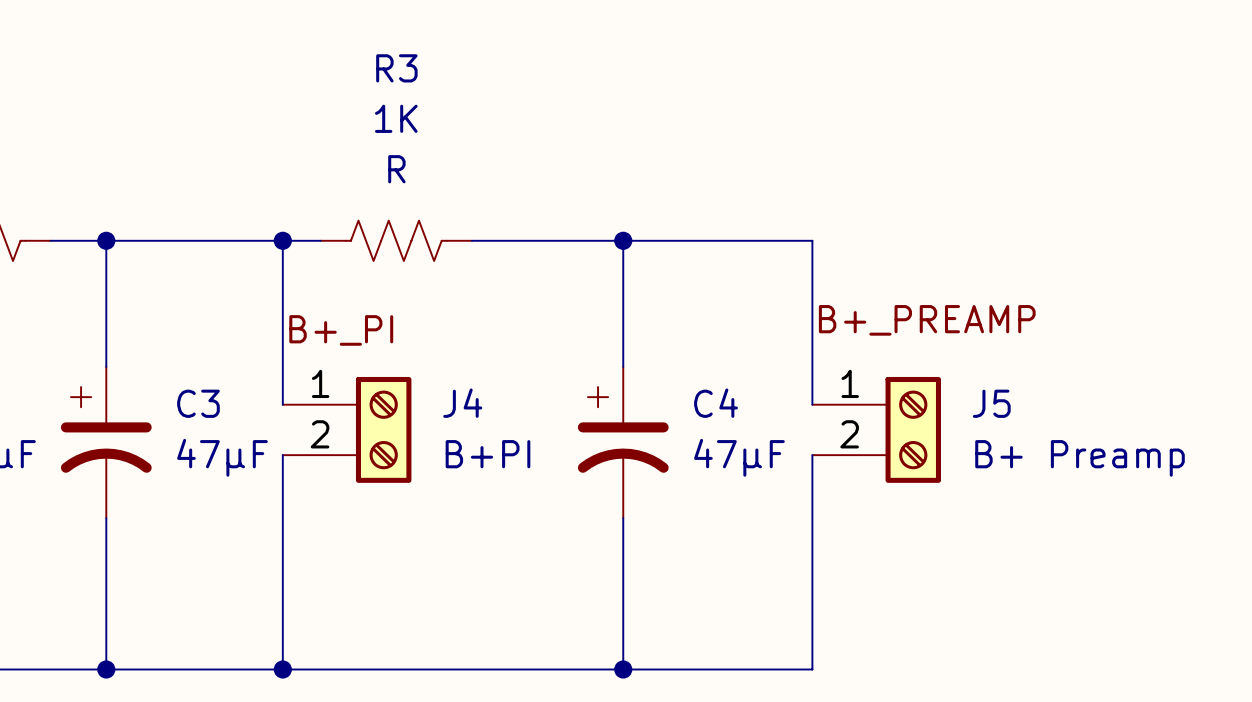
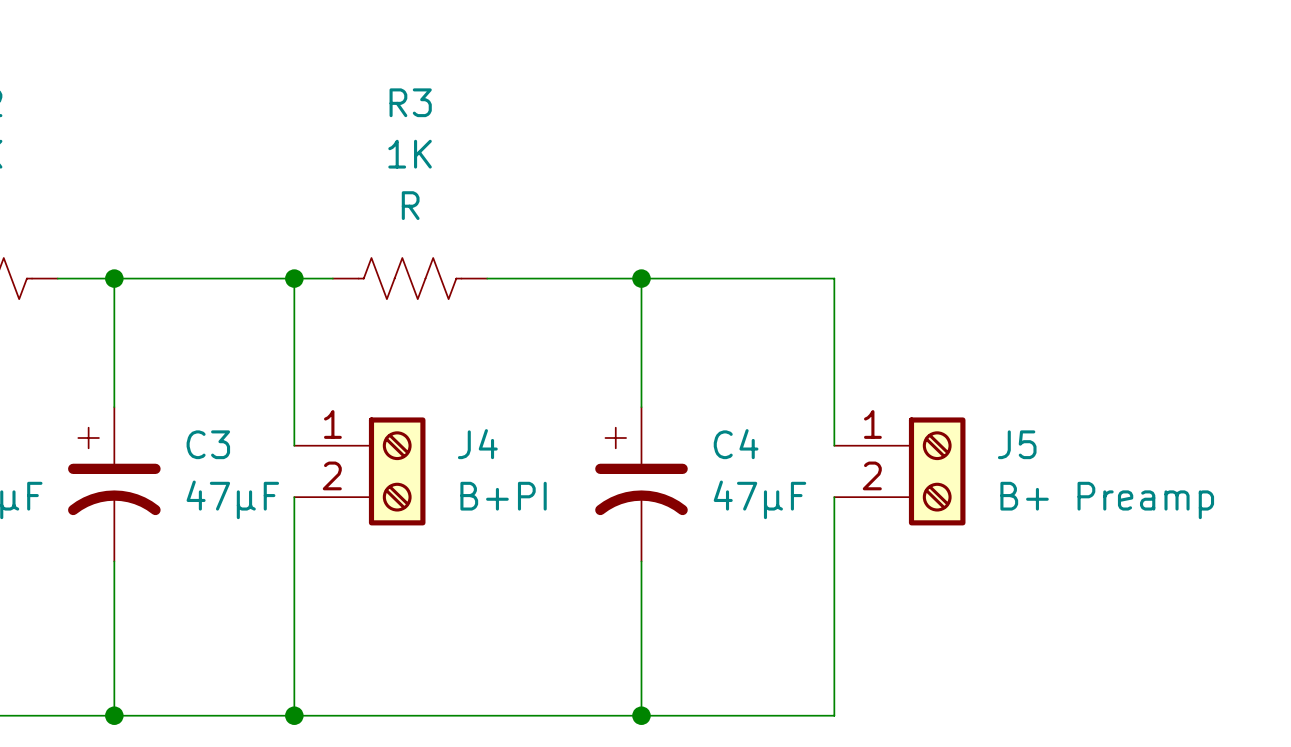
label: B+_PREAMP (927, 320) -> none
label: B+_PI (341, 330) -> none

